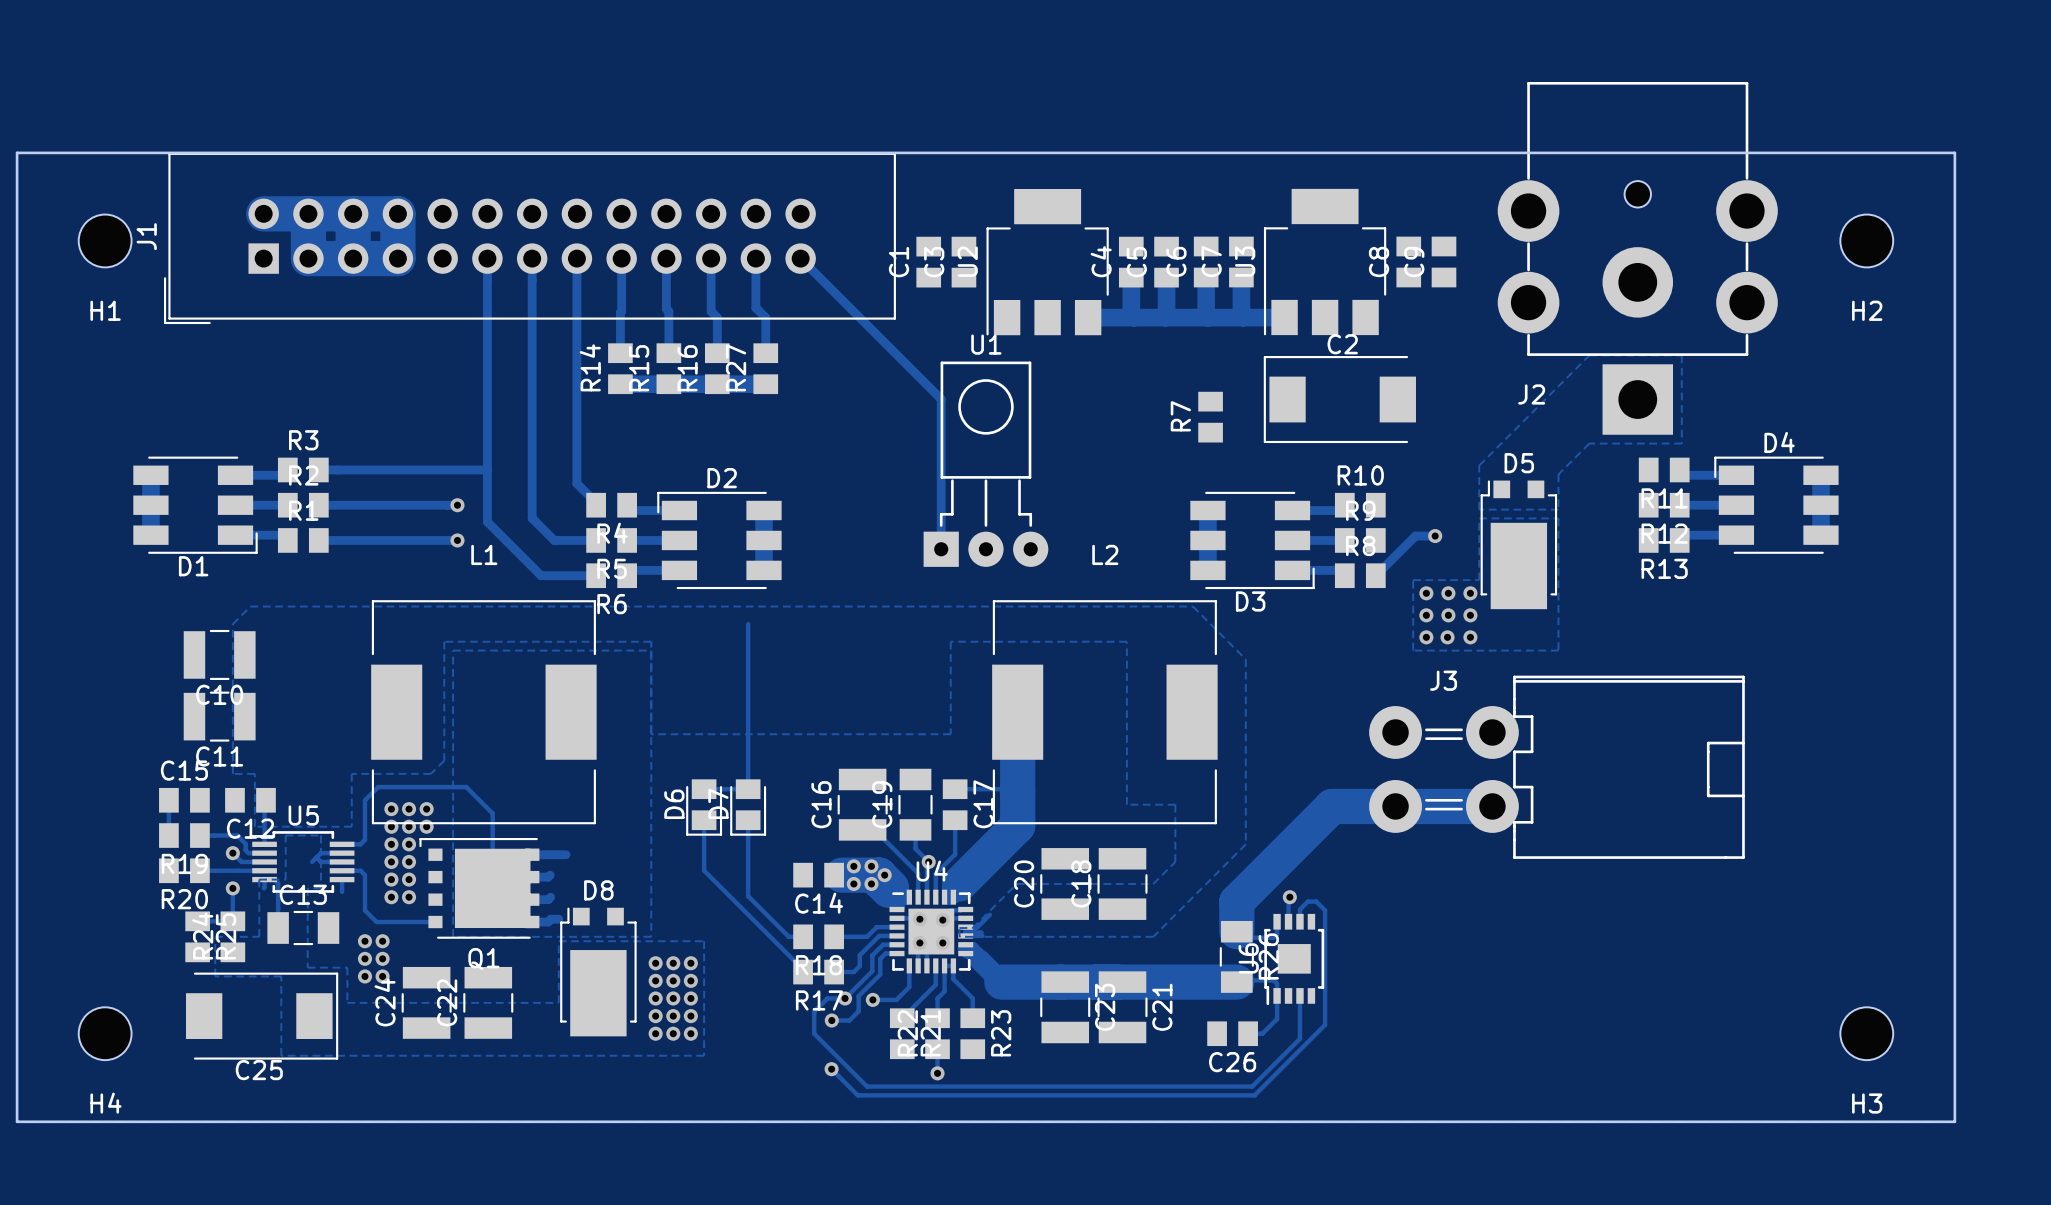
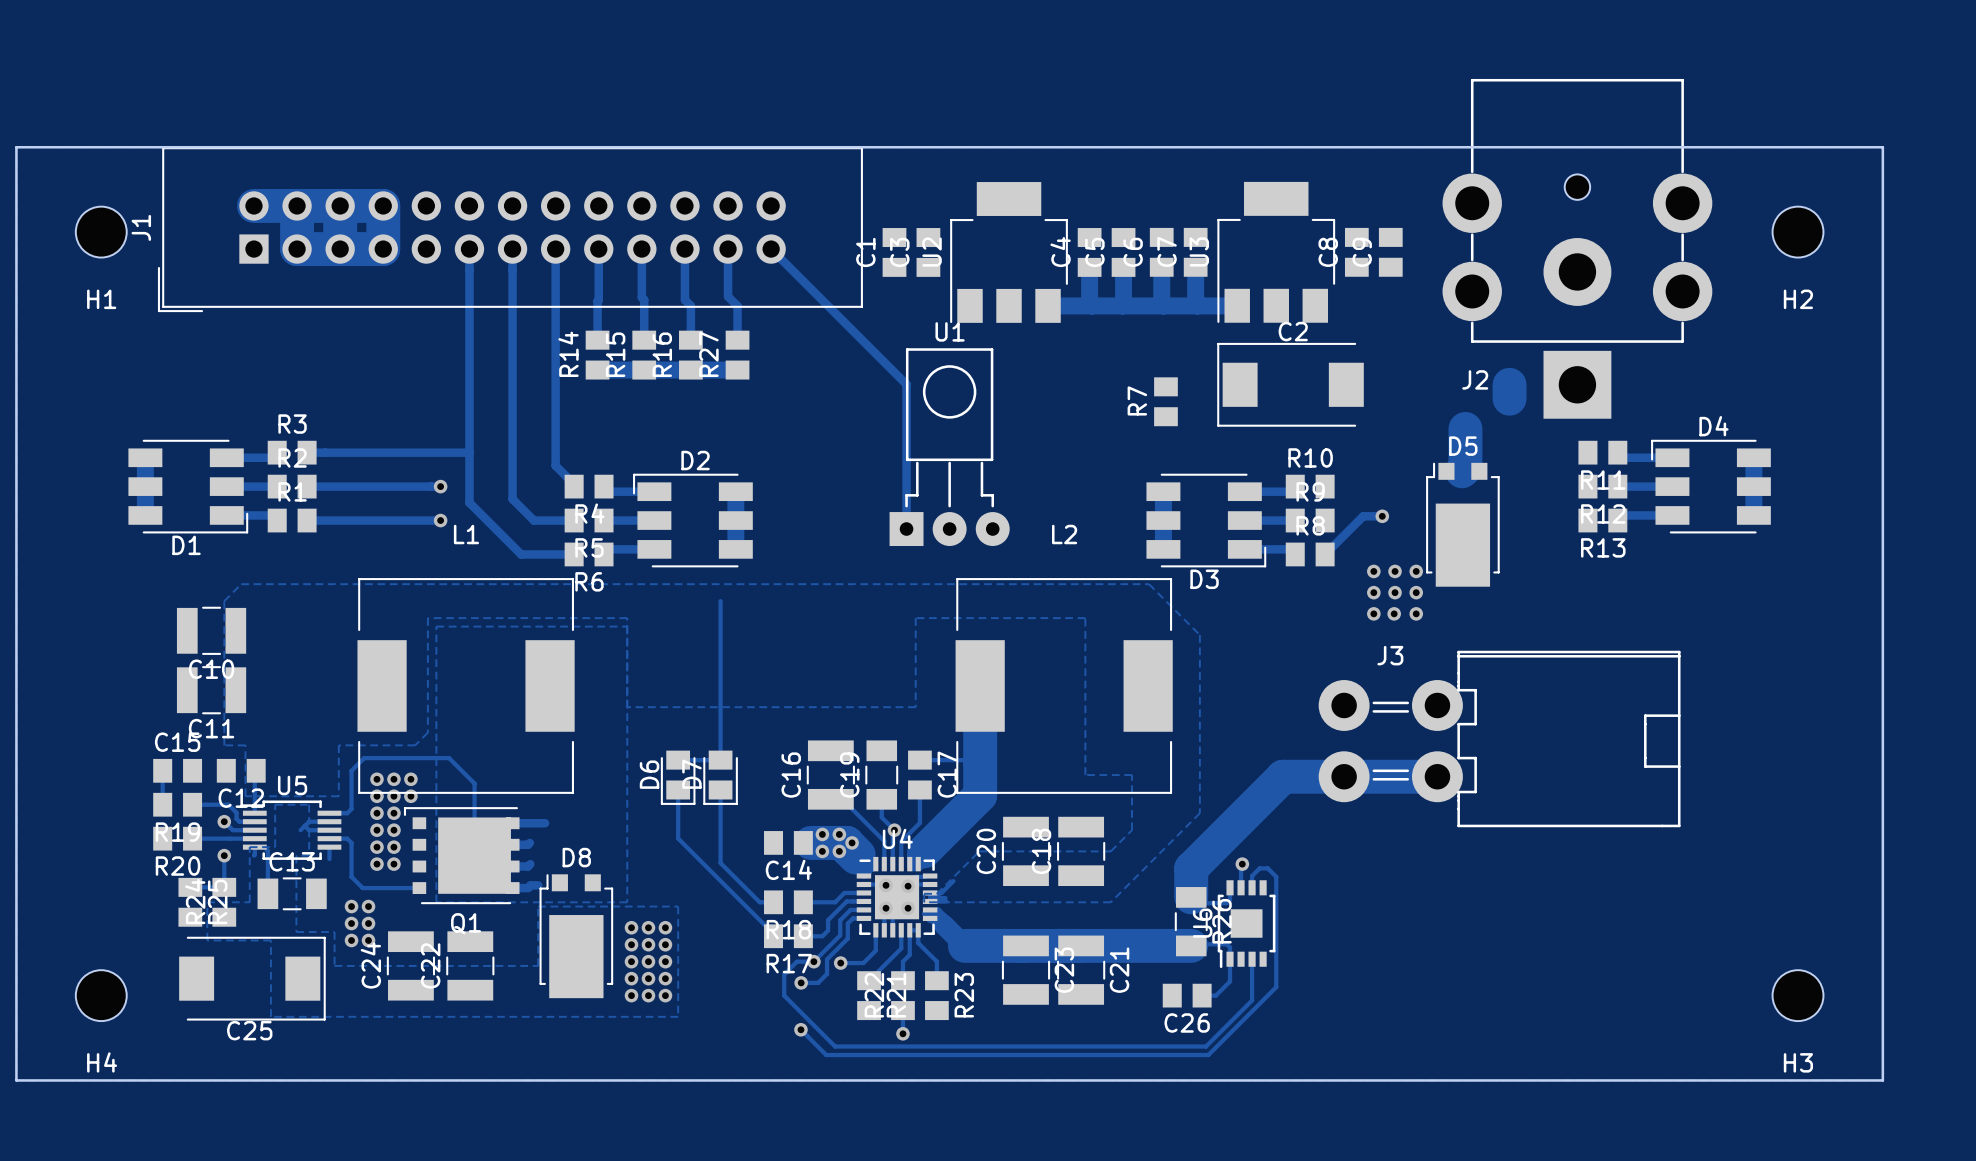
zone outline: (1589, 355) (1479, 465) (1479, 509) (1558, 509) (1558, 474) (1589, 443) (1681, 443) (1681, 355) (1589, 355) -> none
track: none -> (1509, 384) (1509, 398)
track: none -> (1465, 428) (1465, 467) (1462, 471)
zone outline: (1479, 518) (1479, 580) (1413, 580) (1413, 650) (1558, 650) (1558, 518) (1479, 518) -> none

